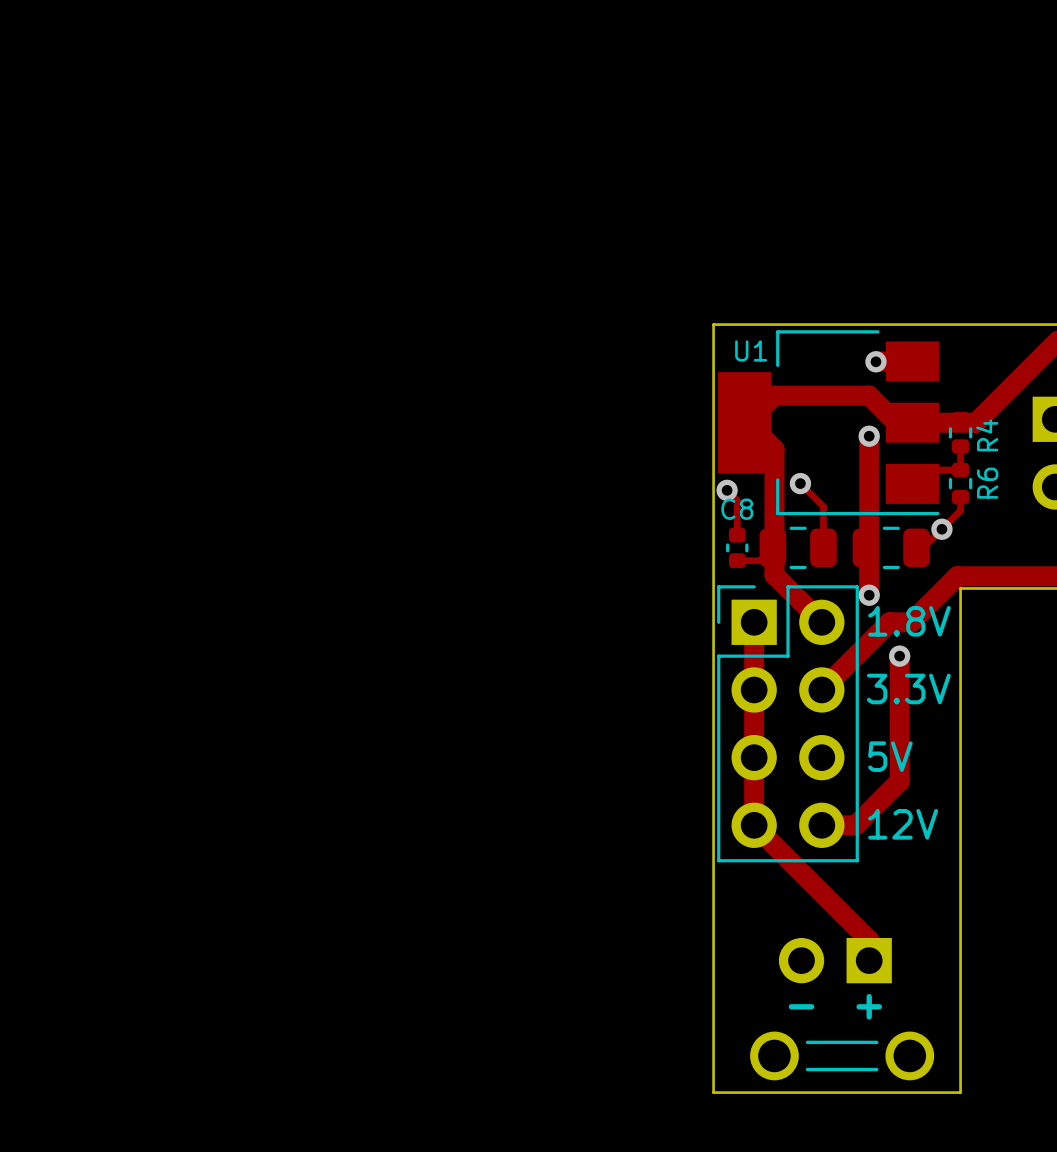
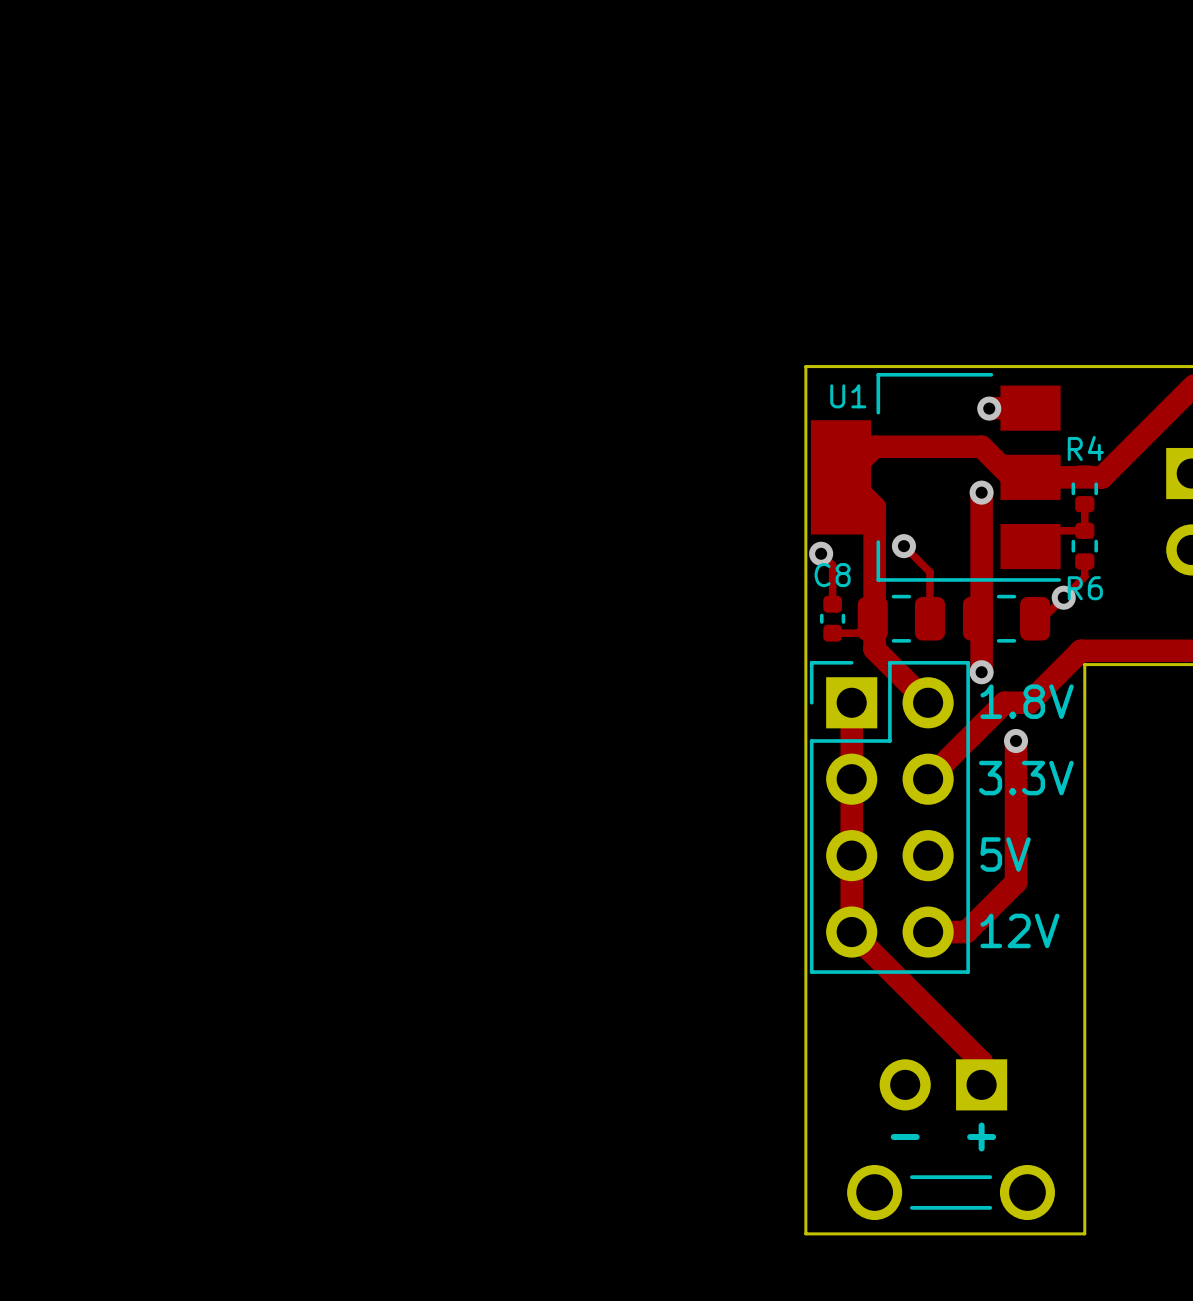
R4 name rotation: 0° (987, 435) -> 90° clockwise (1085, 448)
R4 name position: R4 (987, 435) -> R4 (1085, 448)
R6 name rotation: 0° (987, 483) -> 90° clockwise (1085, 588)
R6 name position: R6 (987, 483) -> R6 (1085, 588)

